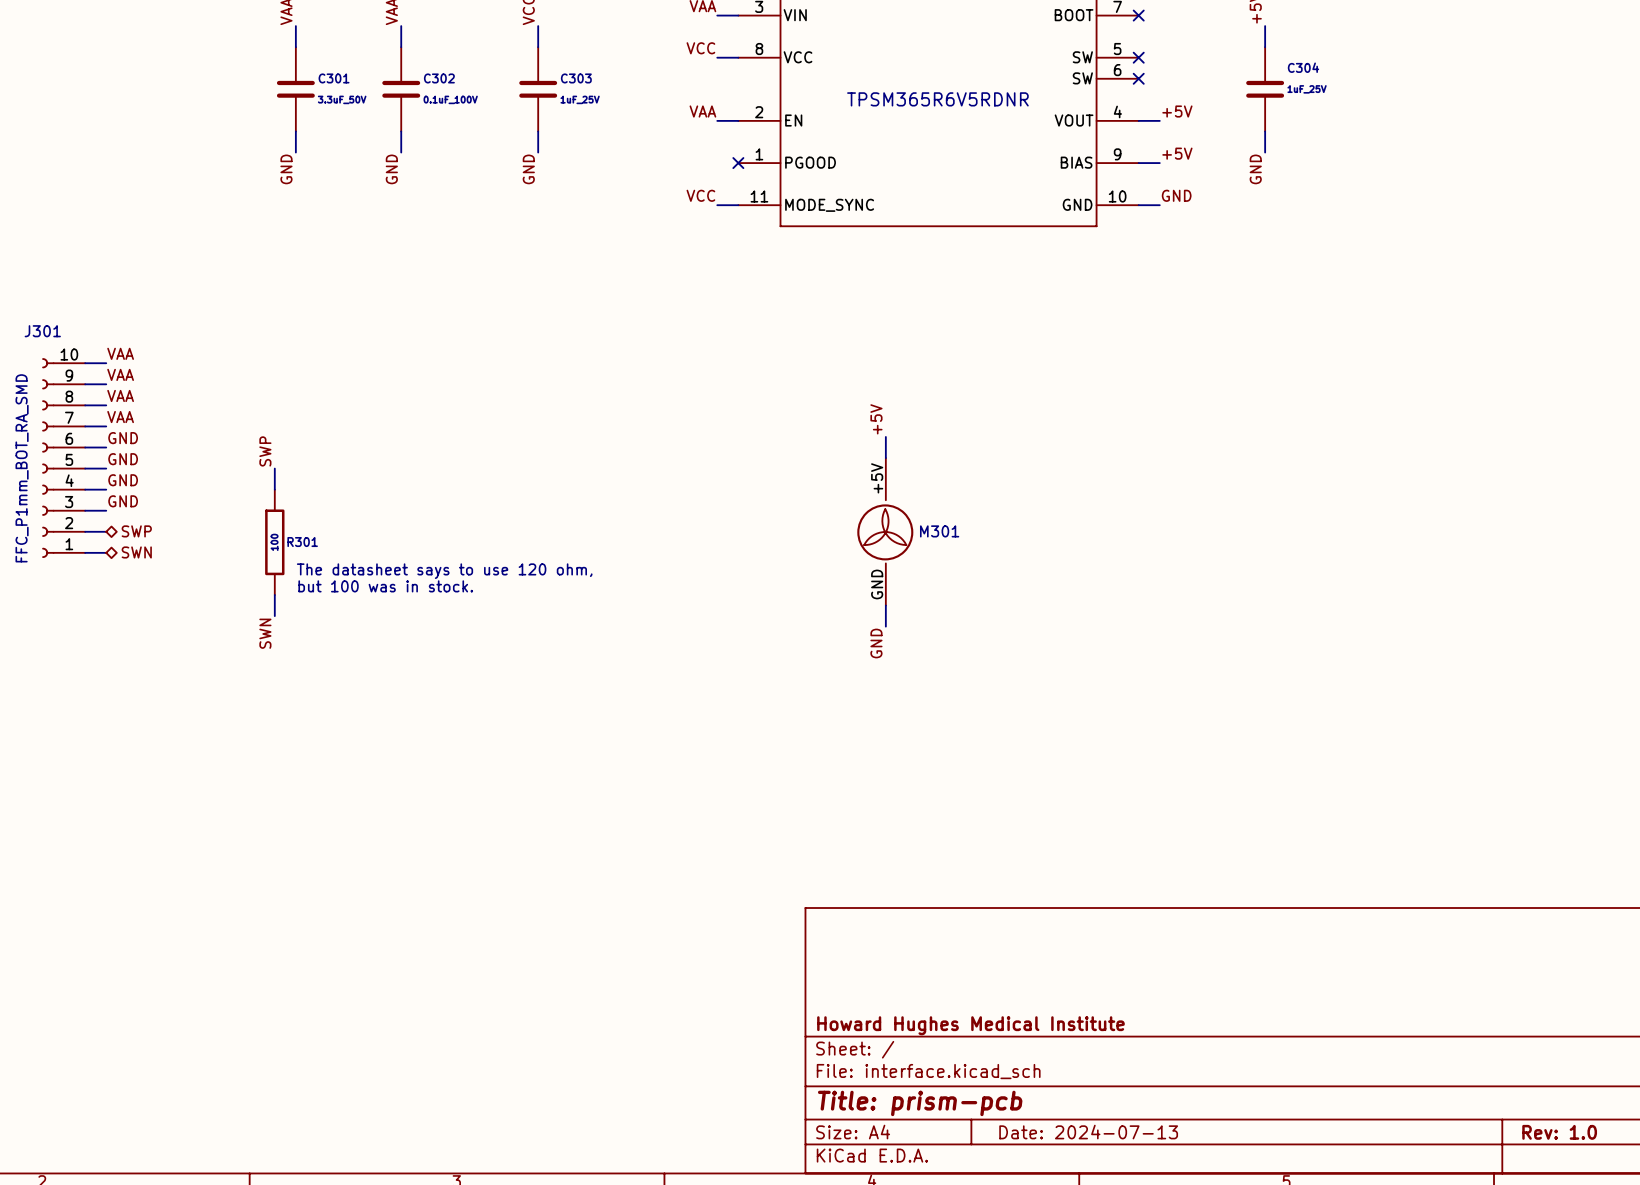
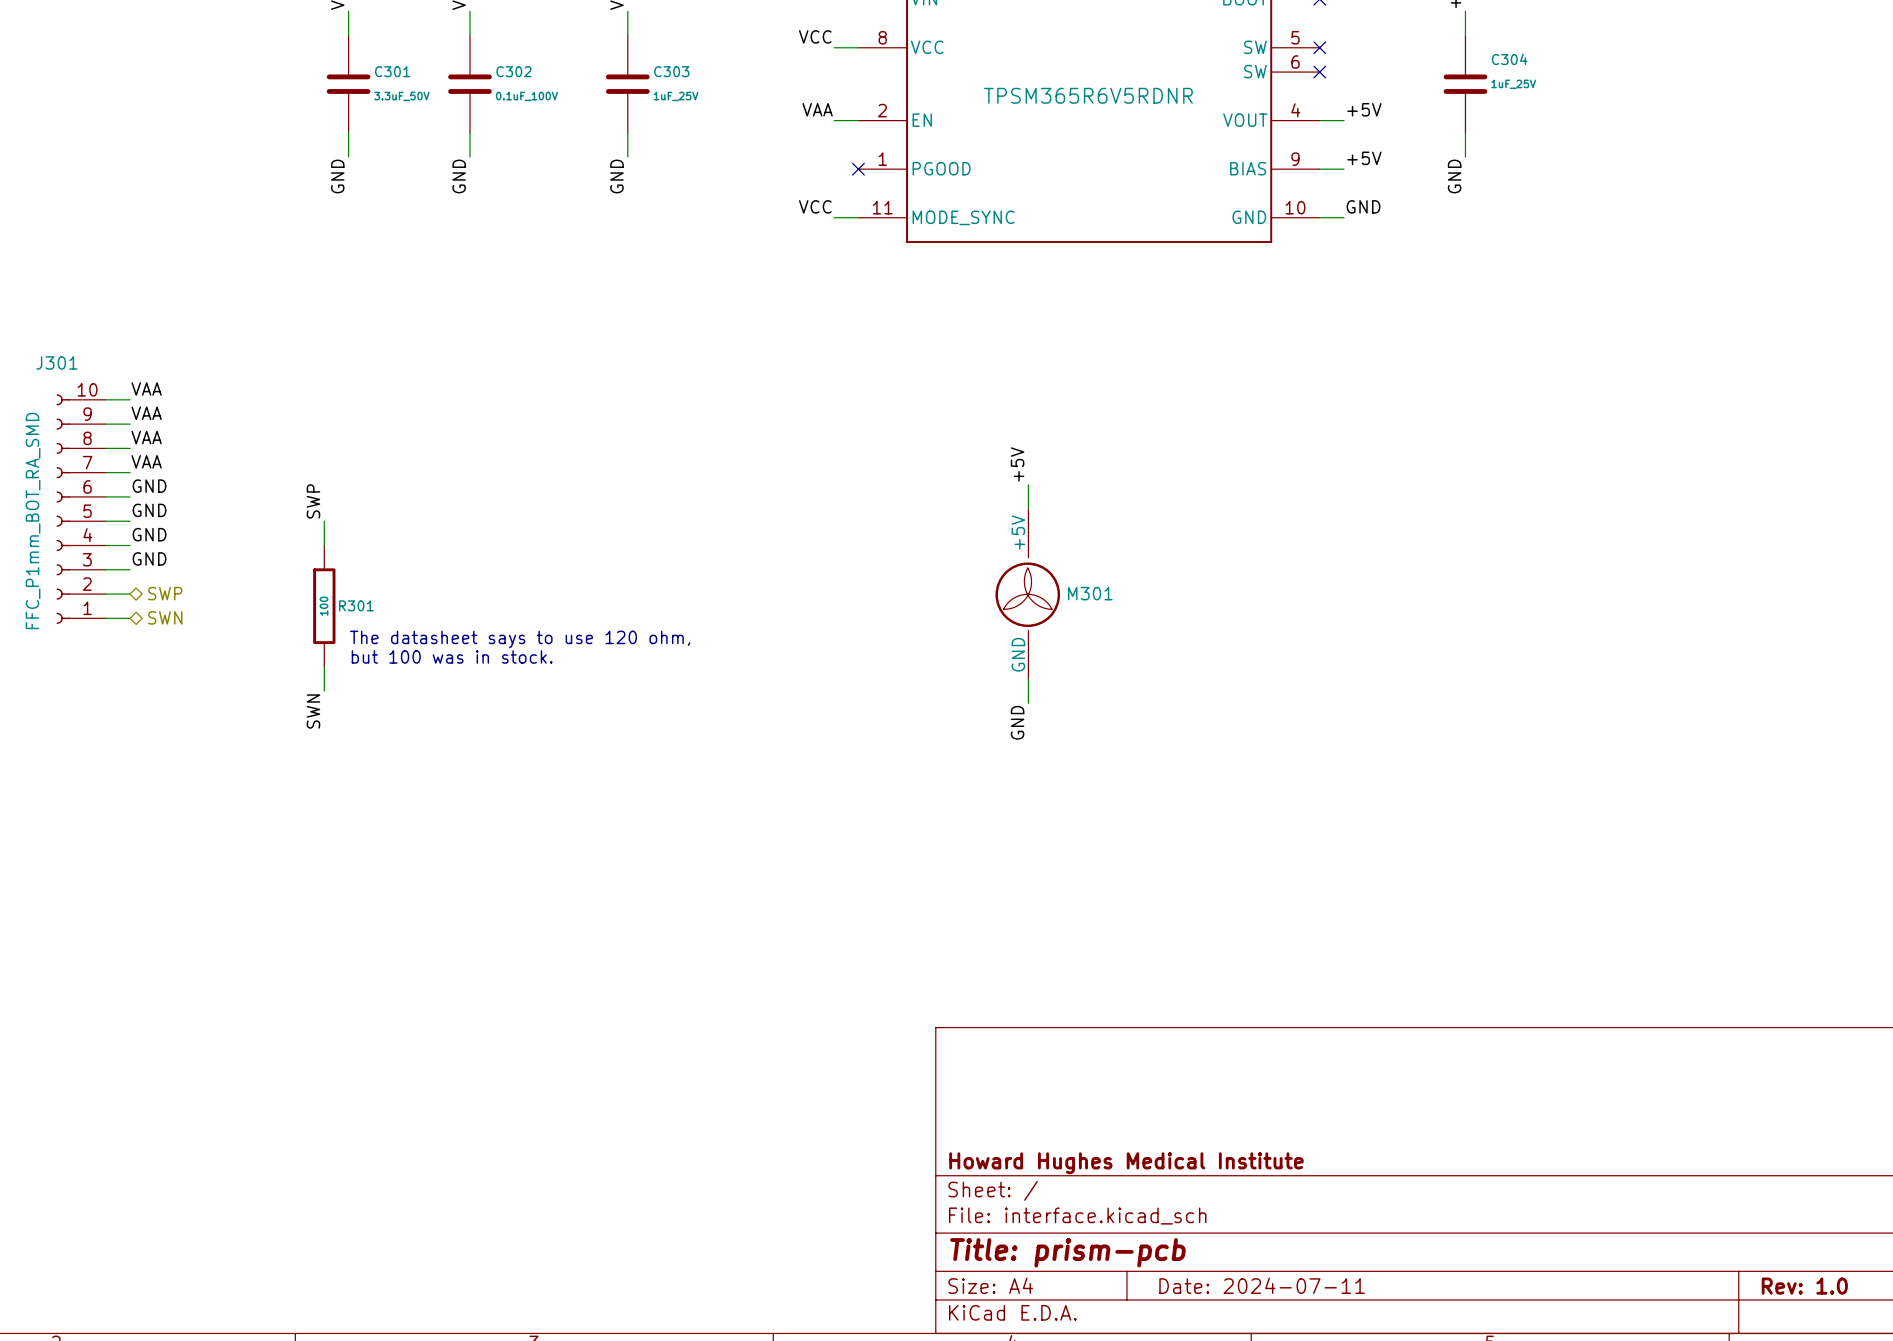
title block: Date: 2024-07-13 (1088, 1132) -> Date: 2024-07-11 (1262, 1285)

